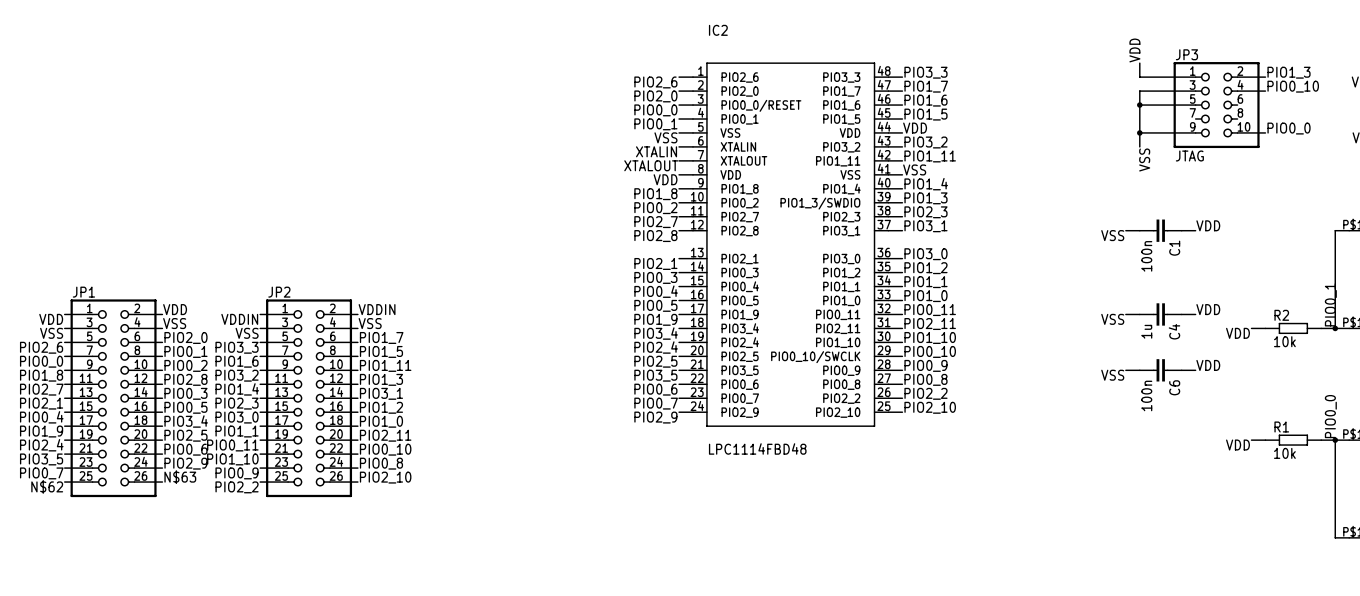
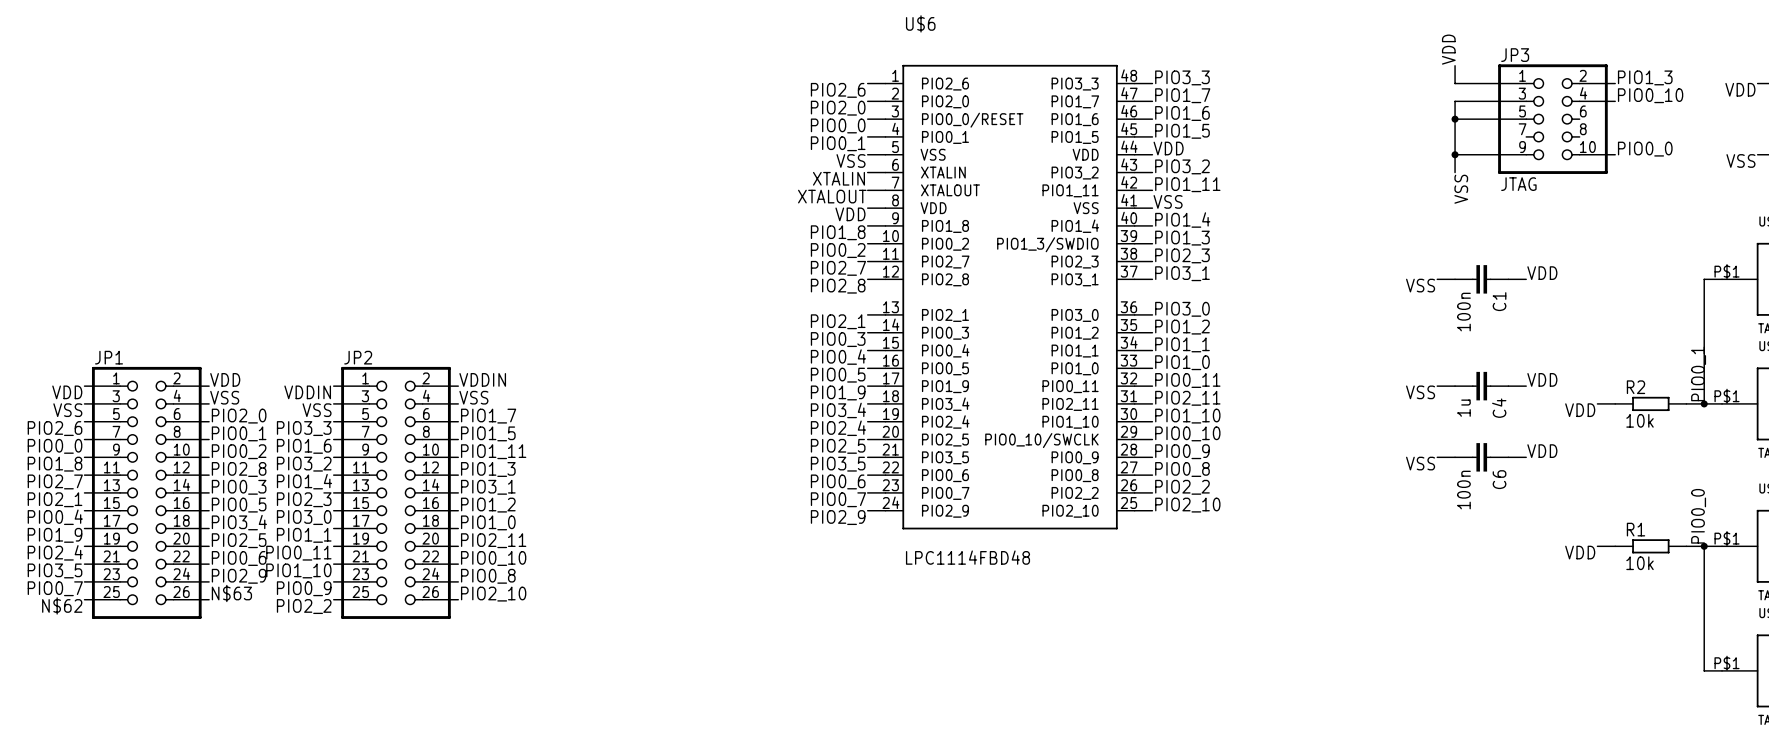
IC2 name: IC2 (718, 30) -> U$6 (920, 23)

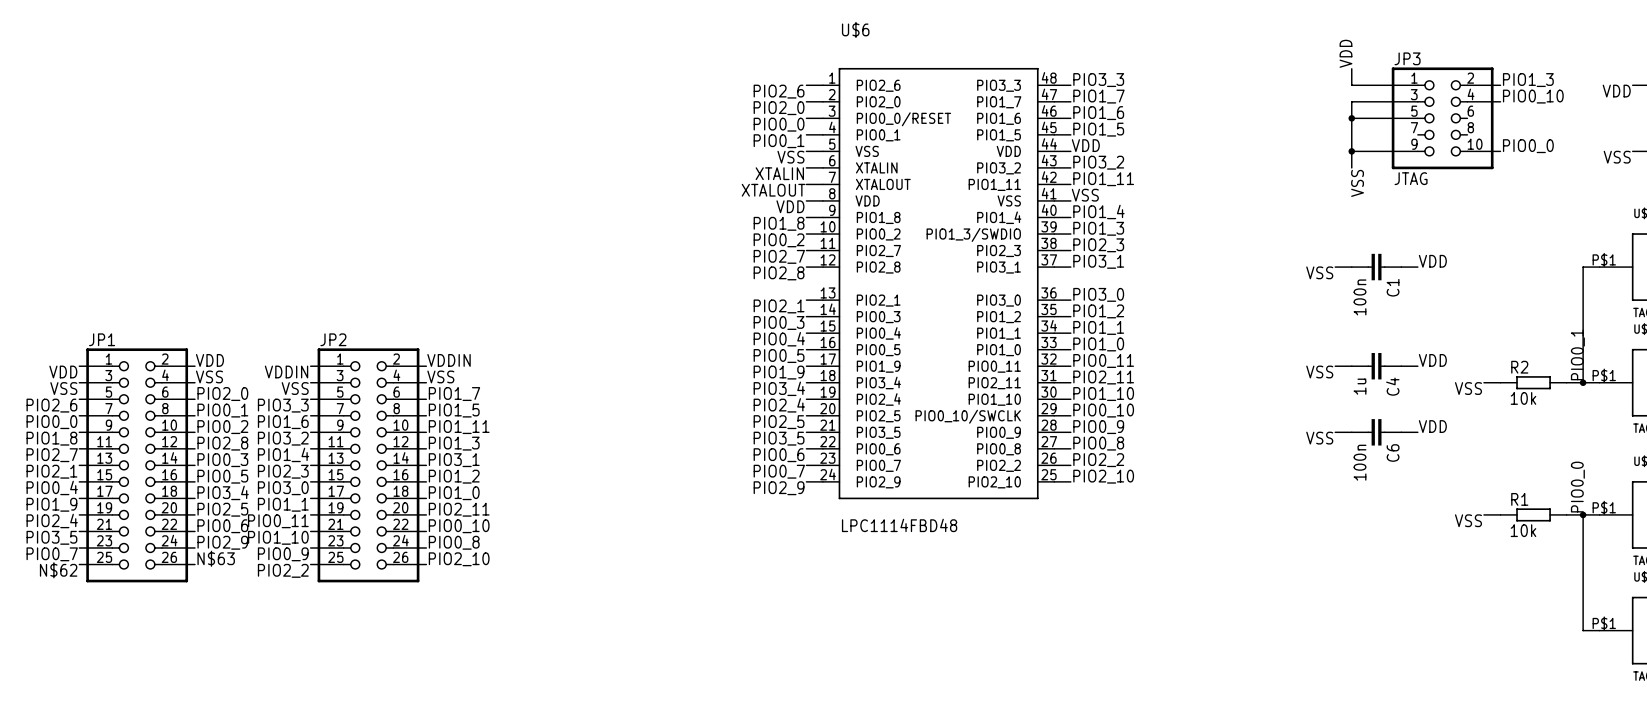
label: VDD (1580, 410) -> VSS (1468, 388)
label: VDD (1580, 552) -> VSS (1468, 520)

